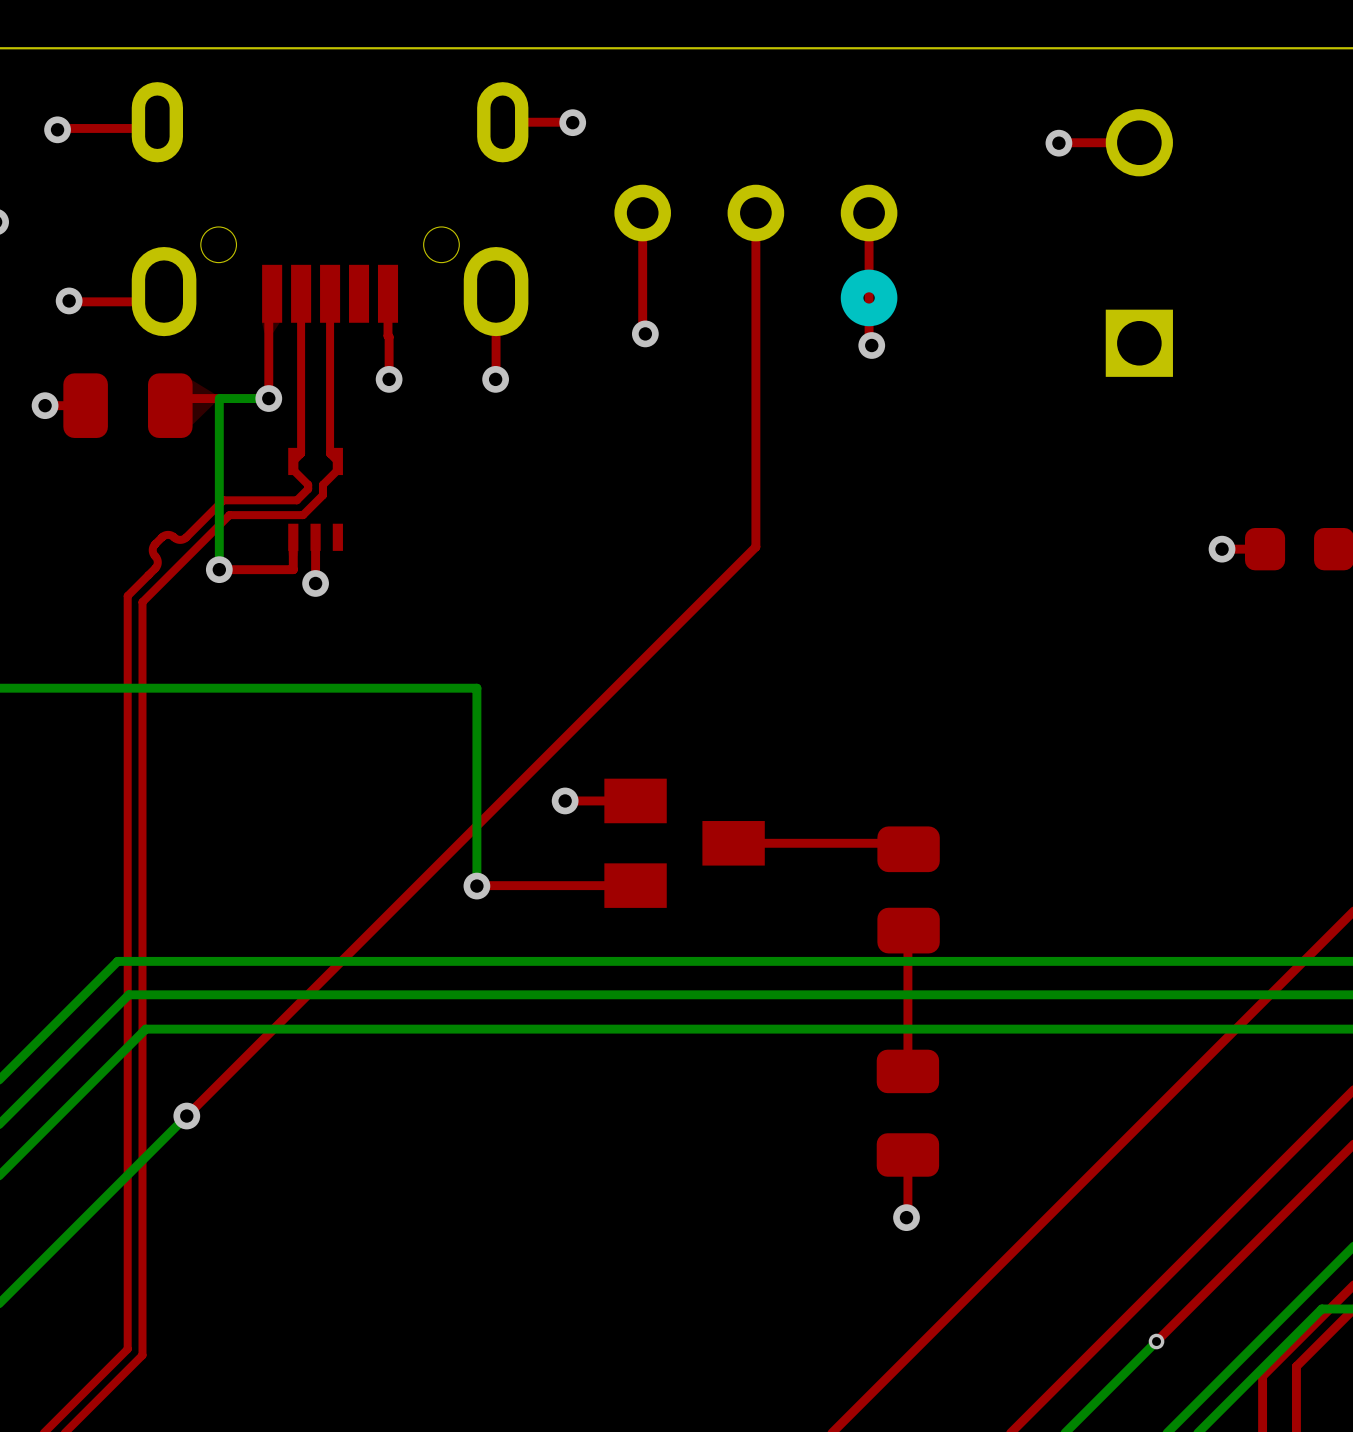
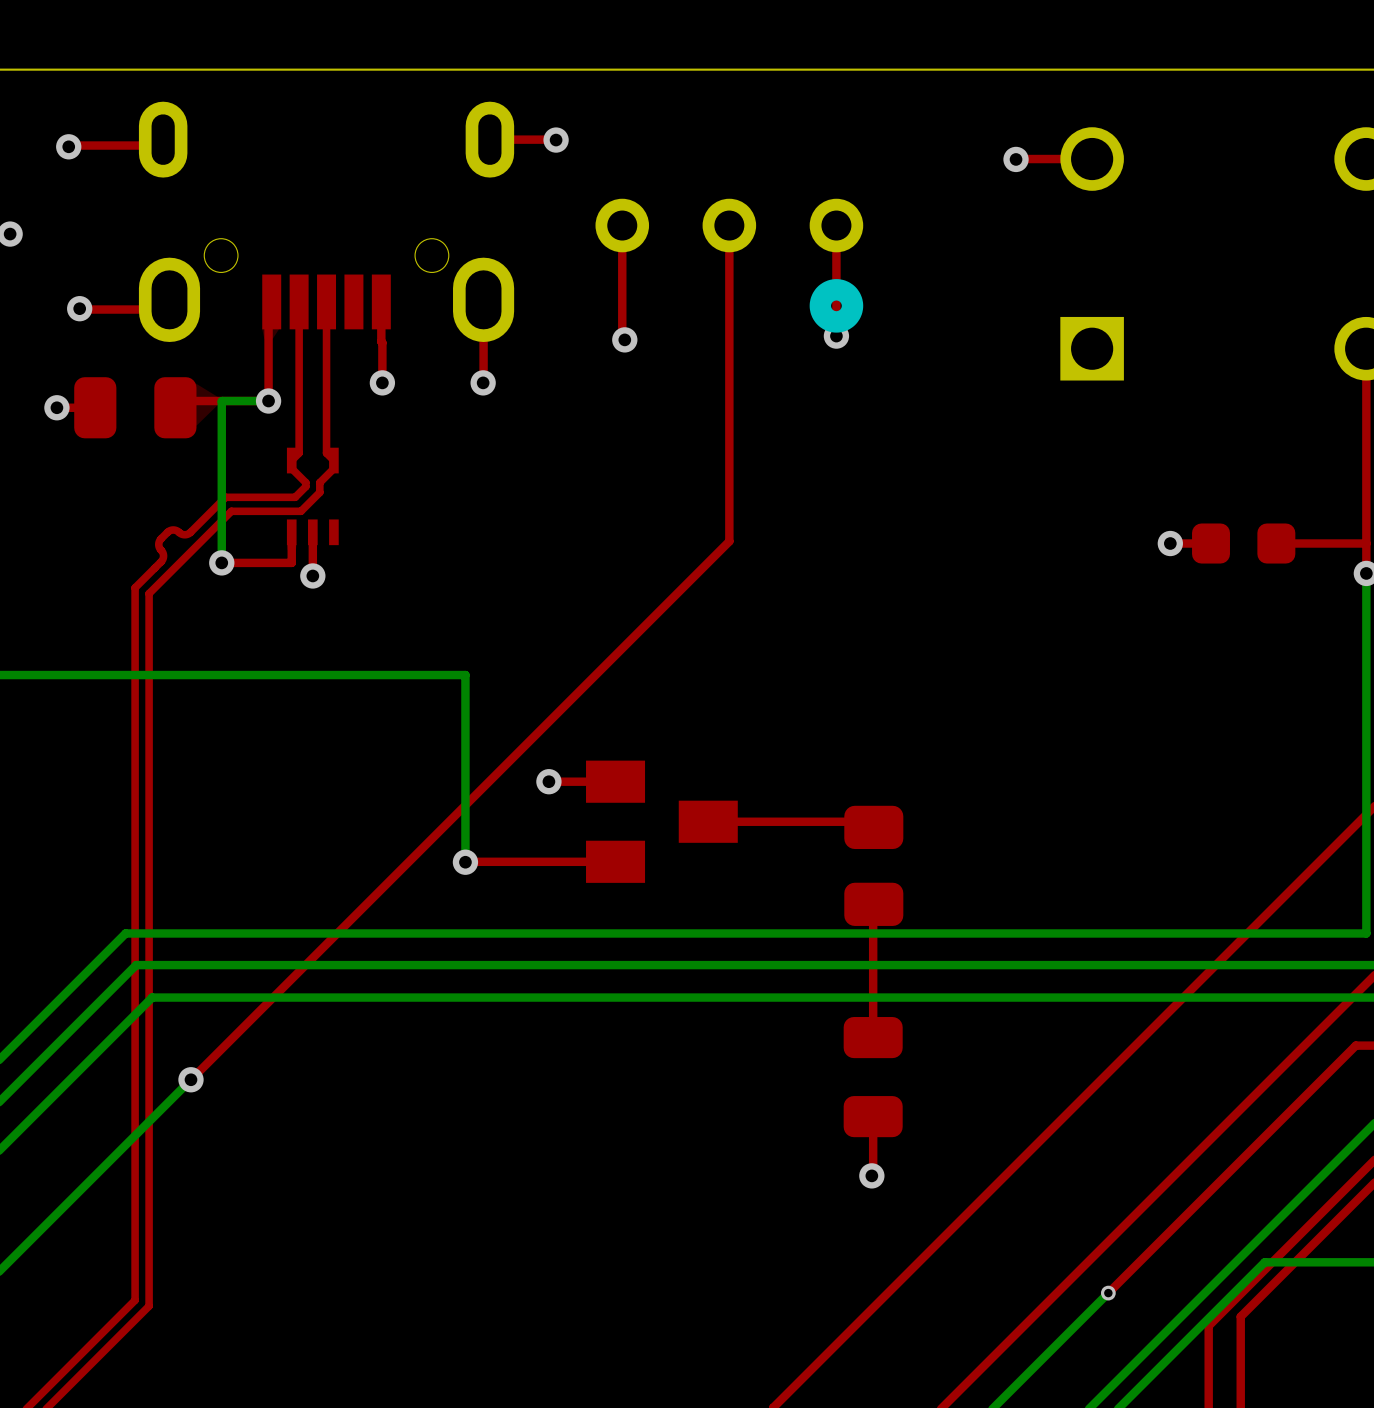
via position: (871, 345) -> (836, 336)

